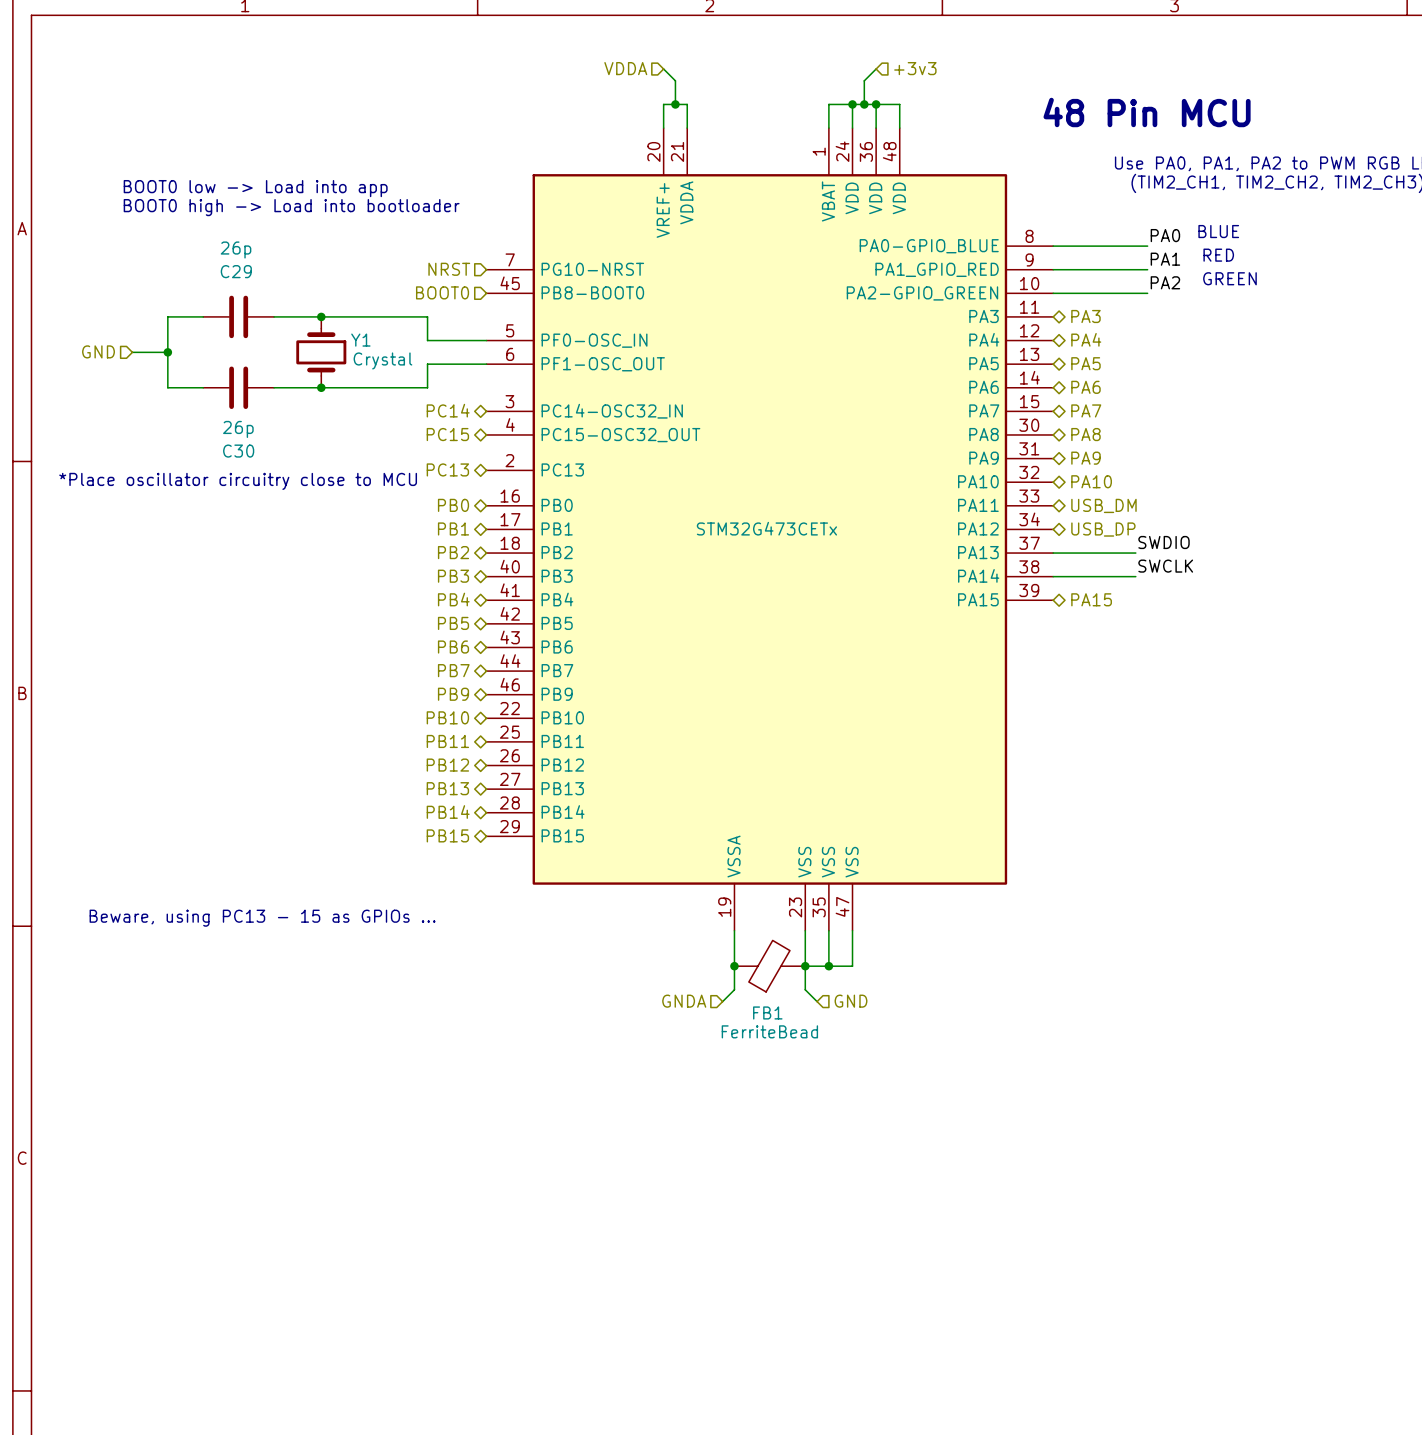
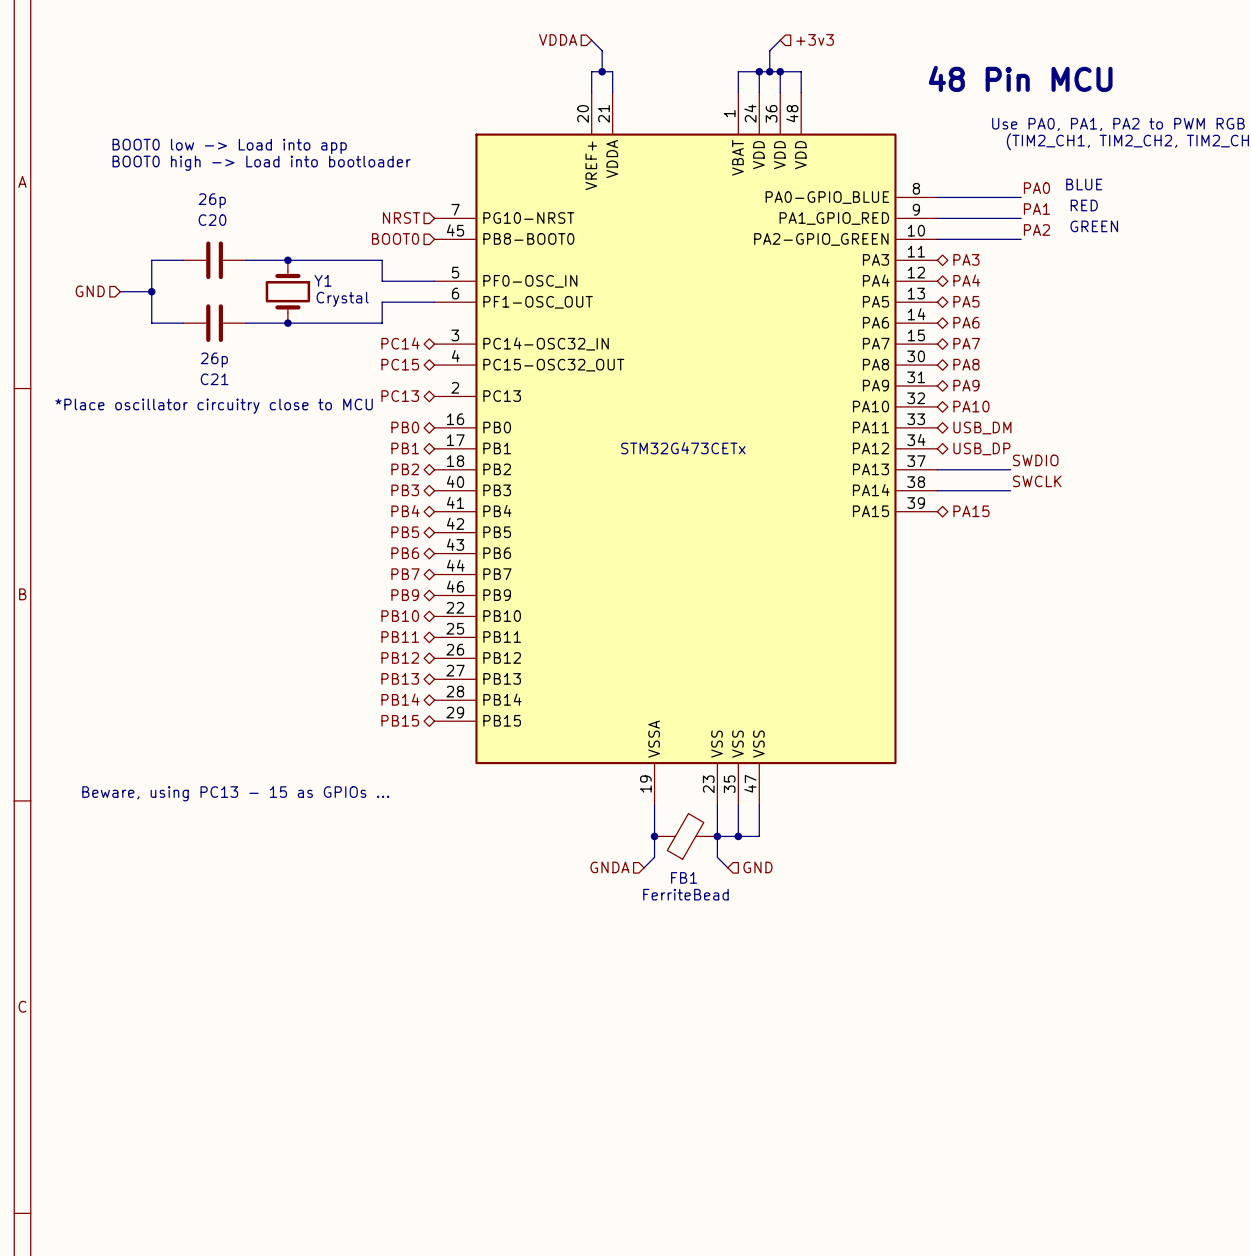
C29 name: C29 (236, 271) -> C20 (212, 220)
C30 name: C30 (238, 451) -> C21 (214, 379)

